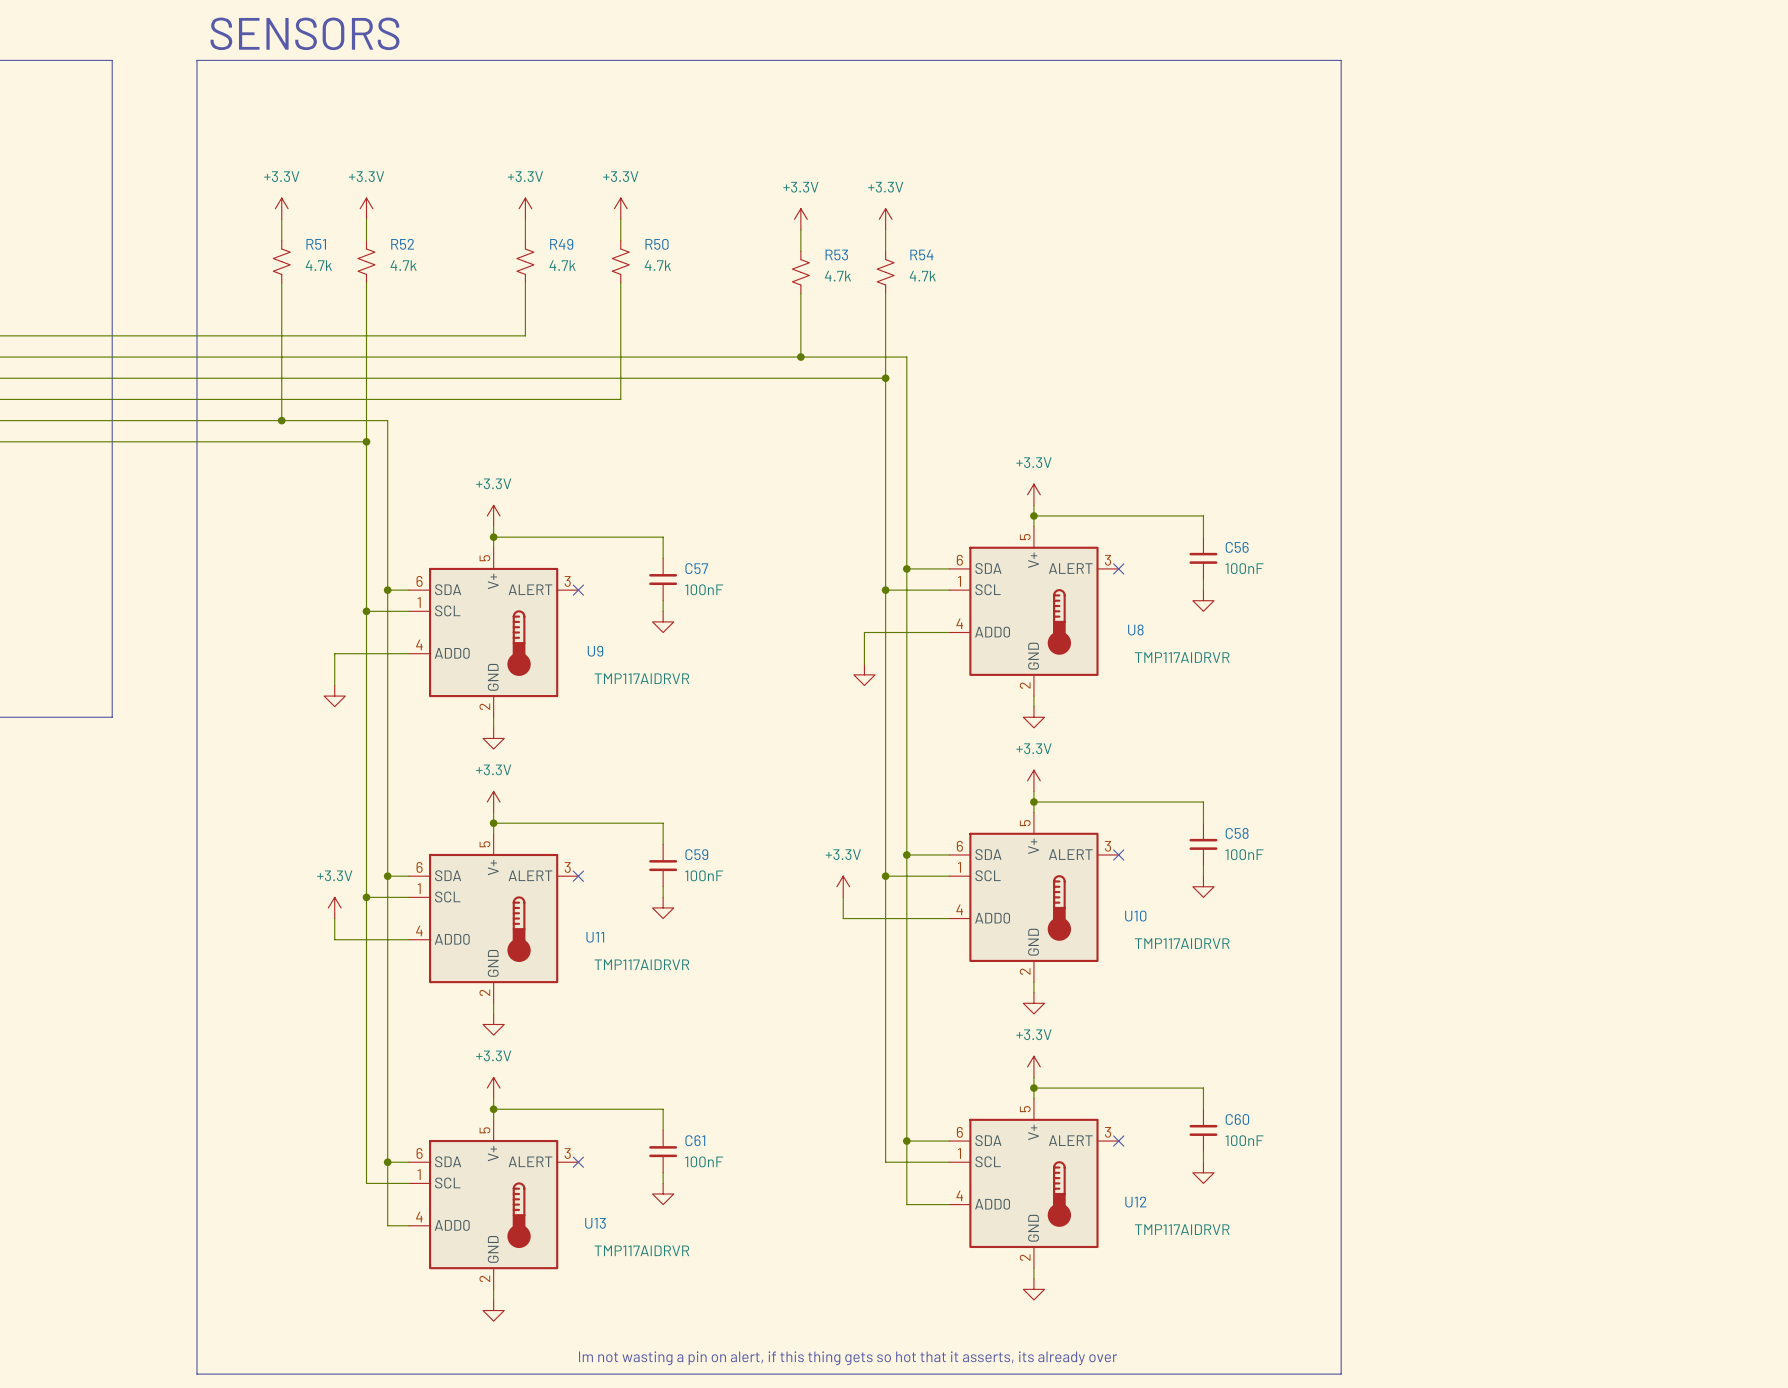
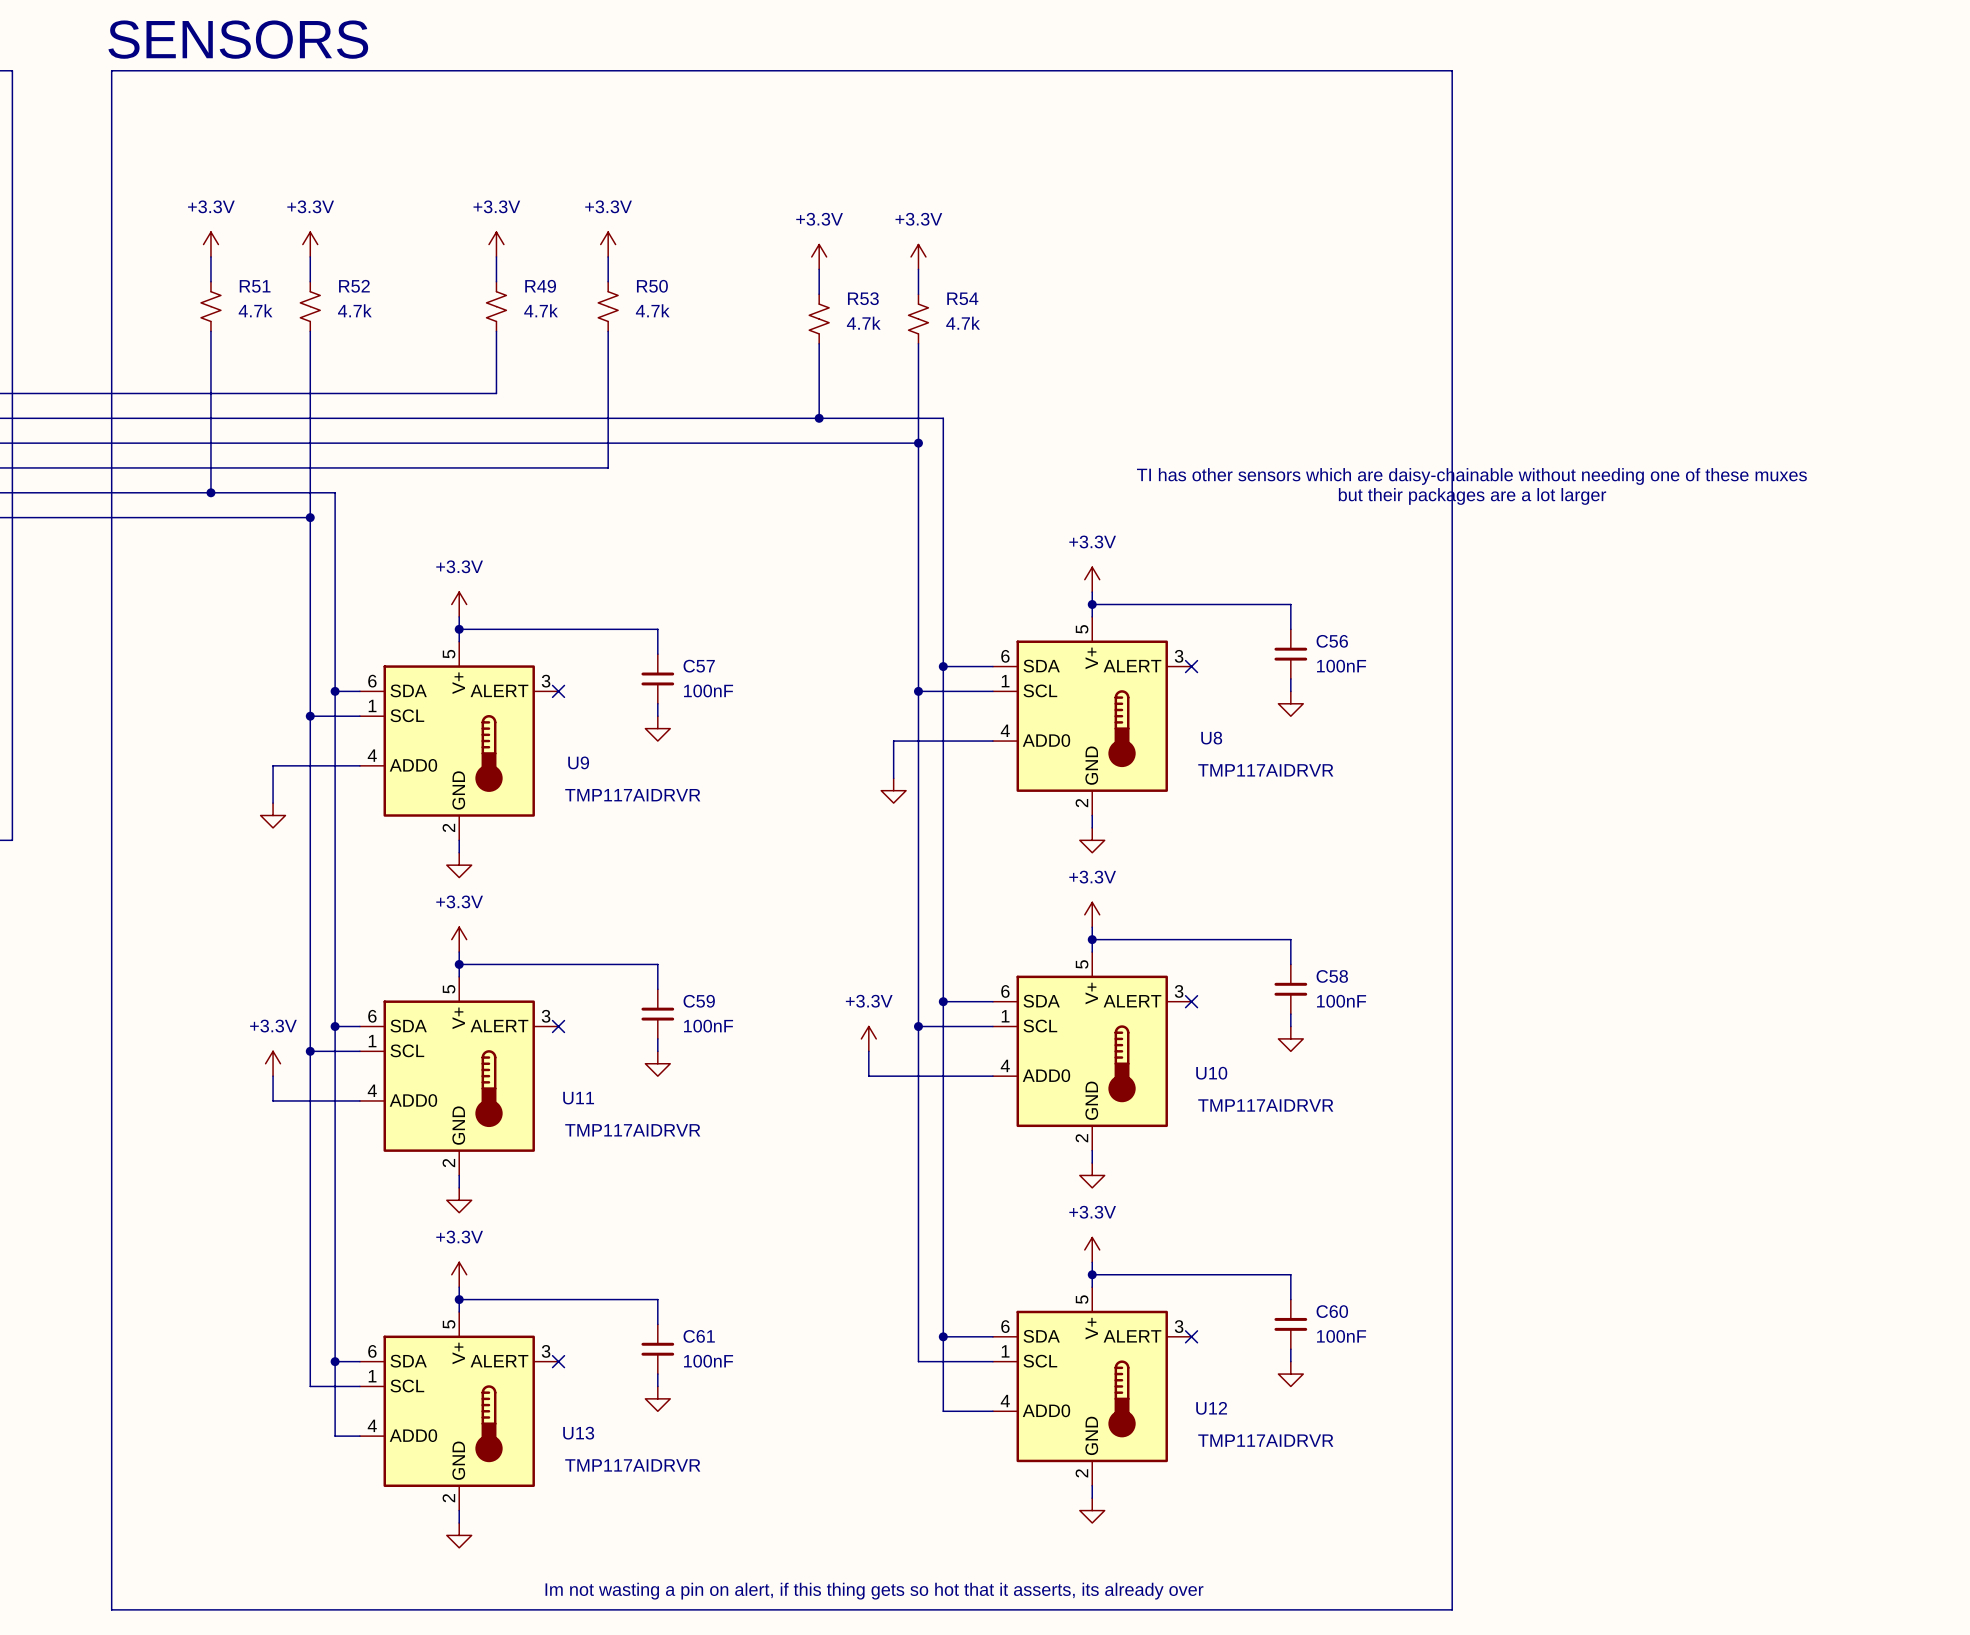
text: none -> TI has other sensors which are daisy-chainable without needing one of these muxes (1471, 476)
text: none -> but their packages are a lot larger (1472, 496)

